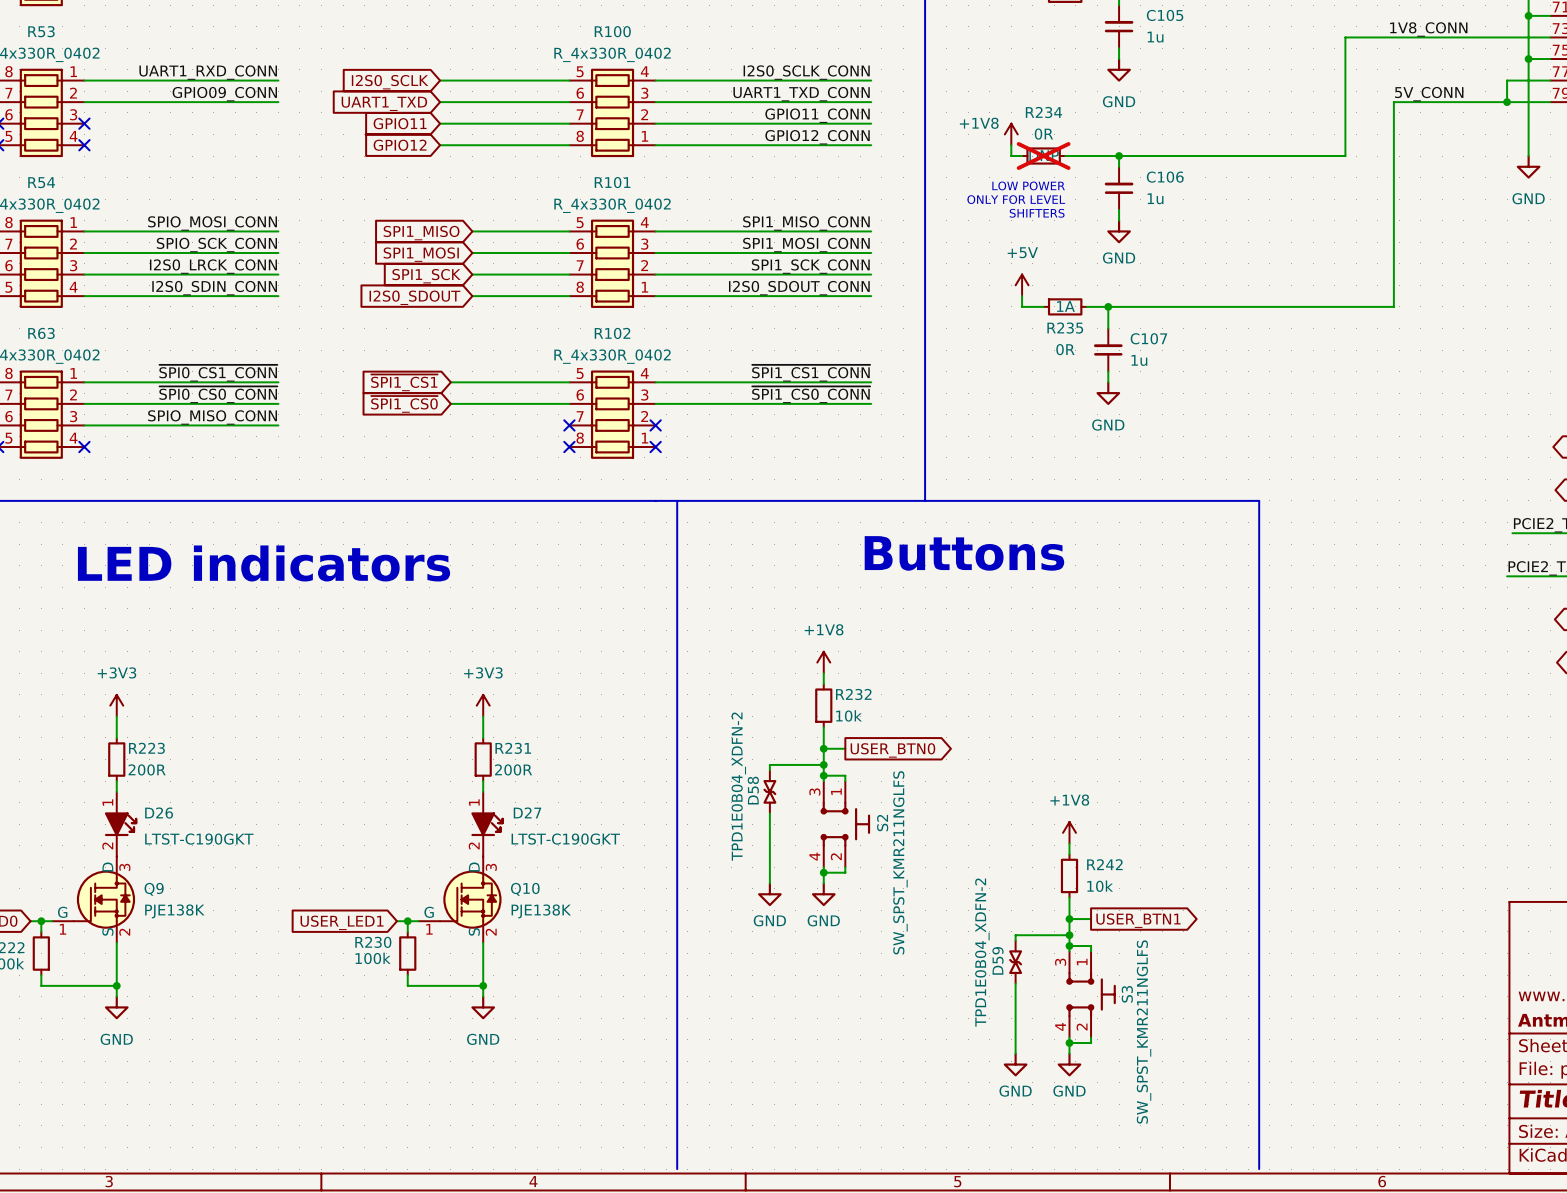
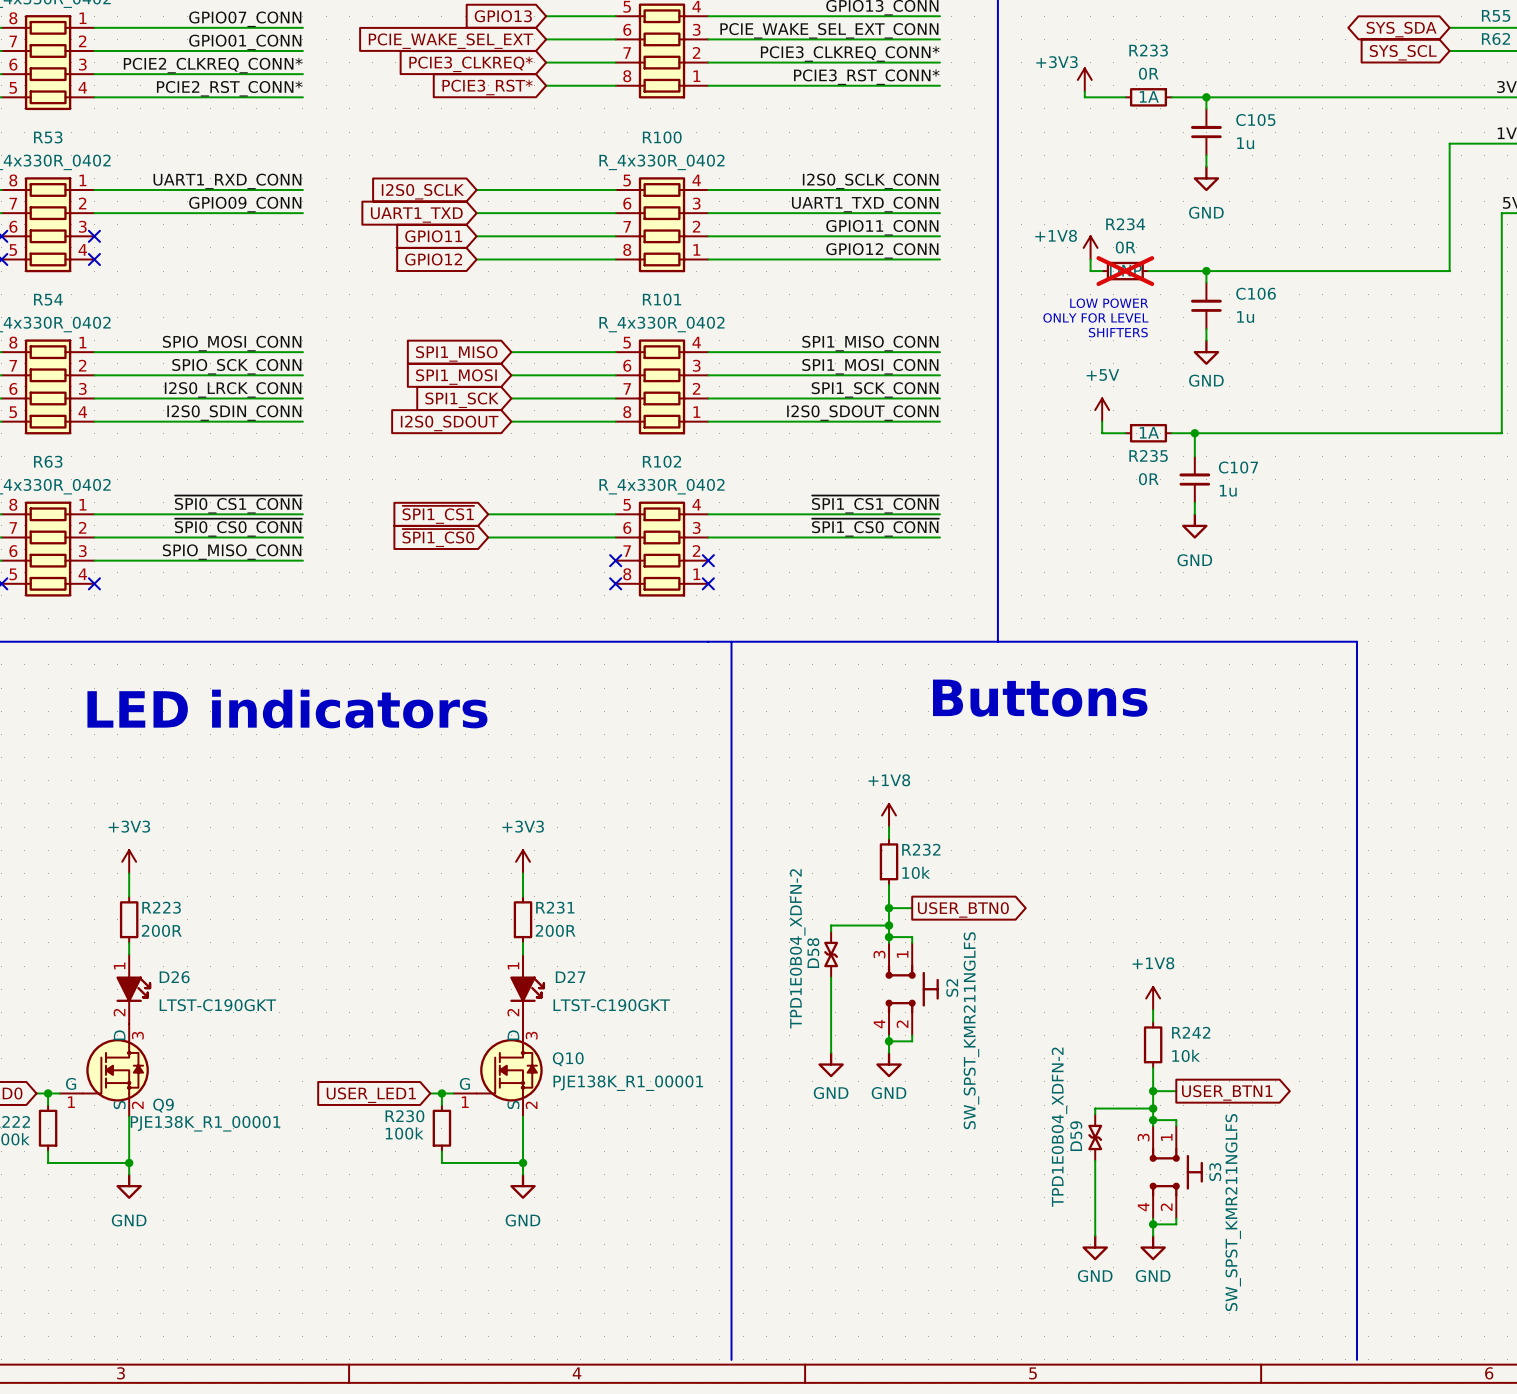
Q9 name position: Q9 (154, 889) -> Q9 (163, 1105)
Q9 value: PJE138K (174, 911) -> none
Q10 text: none -> PJE138K_R1_00001 (628, 1083)
Q9 text: none -> PJE138K_R1_00001 (205, 1123)

